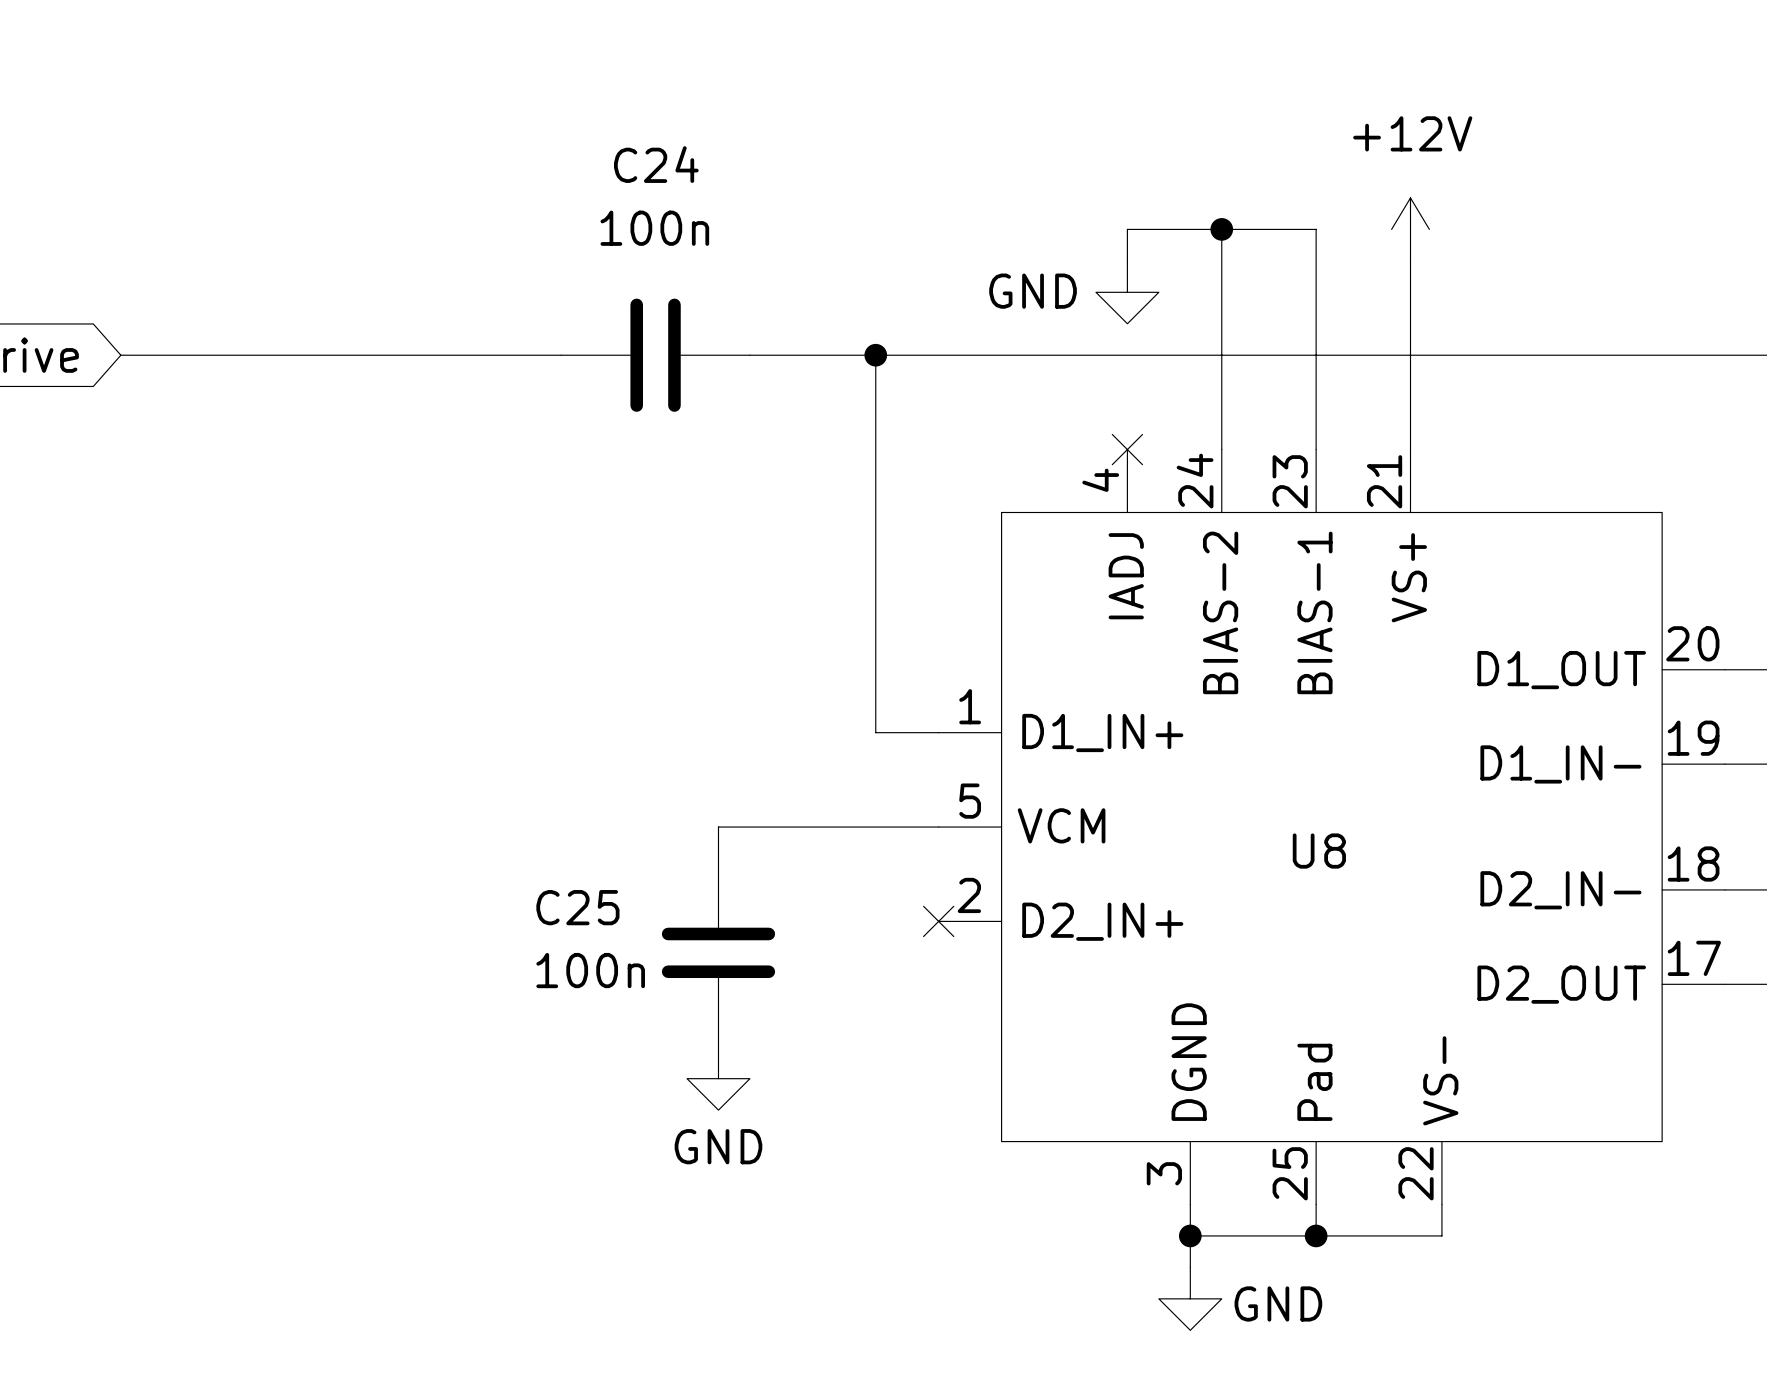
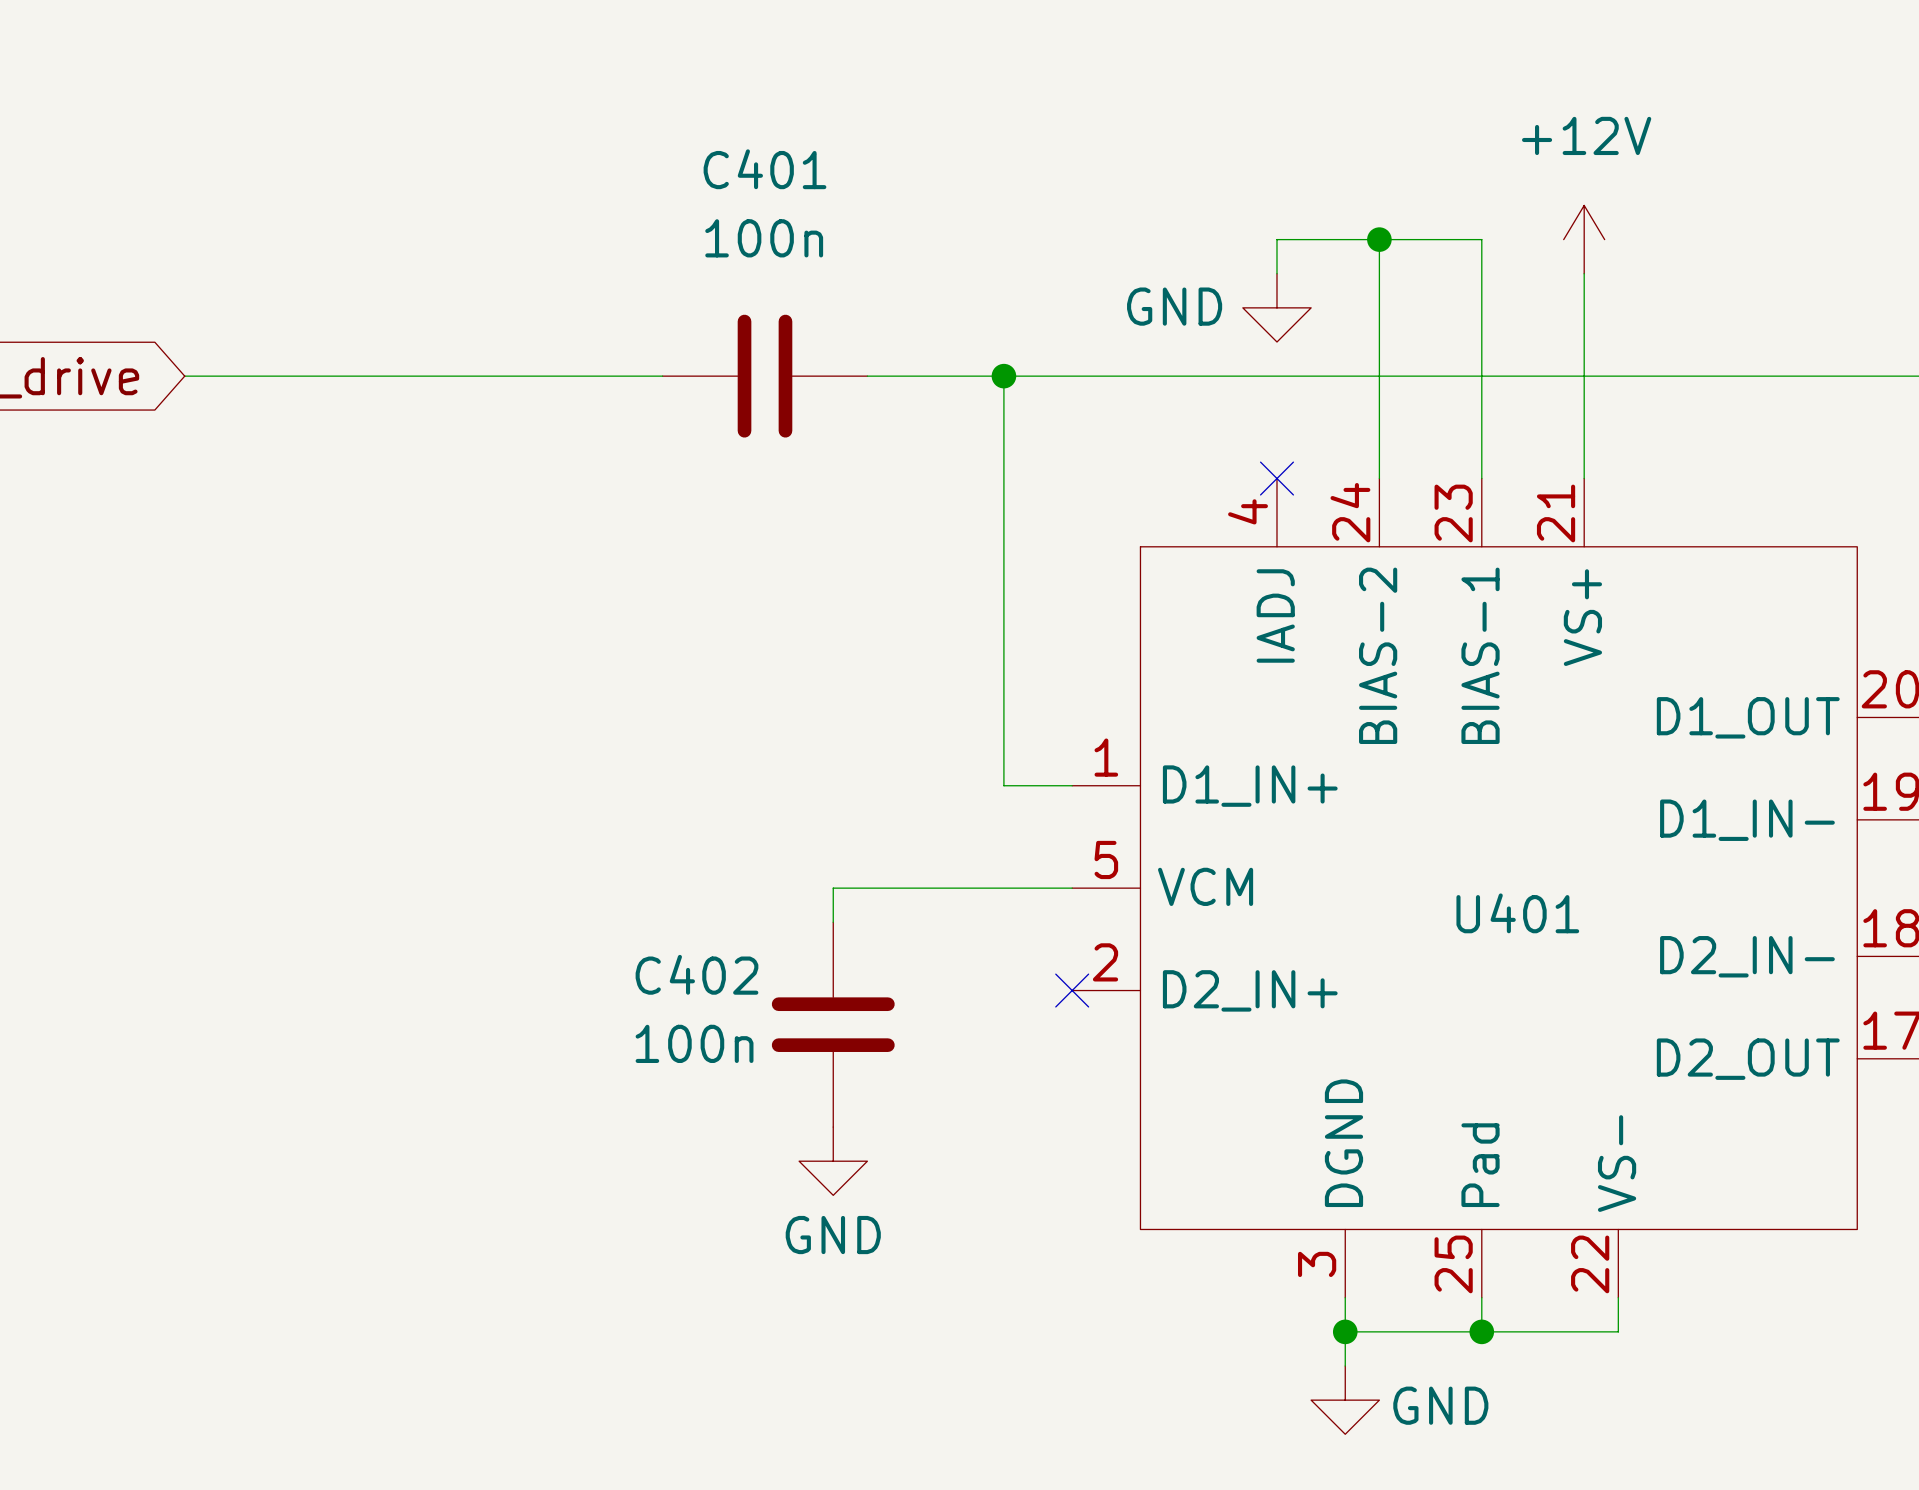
C24 name: C24 (656, 164) -> C401 (764, 169)
U8 name: U8 (1319, 851) -> U401 (1517, 913)
C25 name: C25 (577, 907) -> C402 (696, 974)

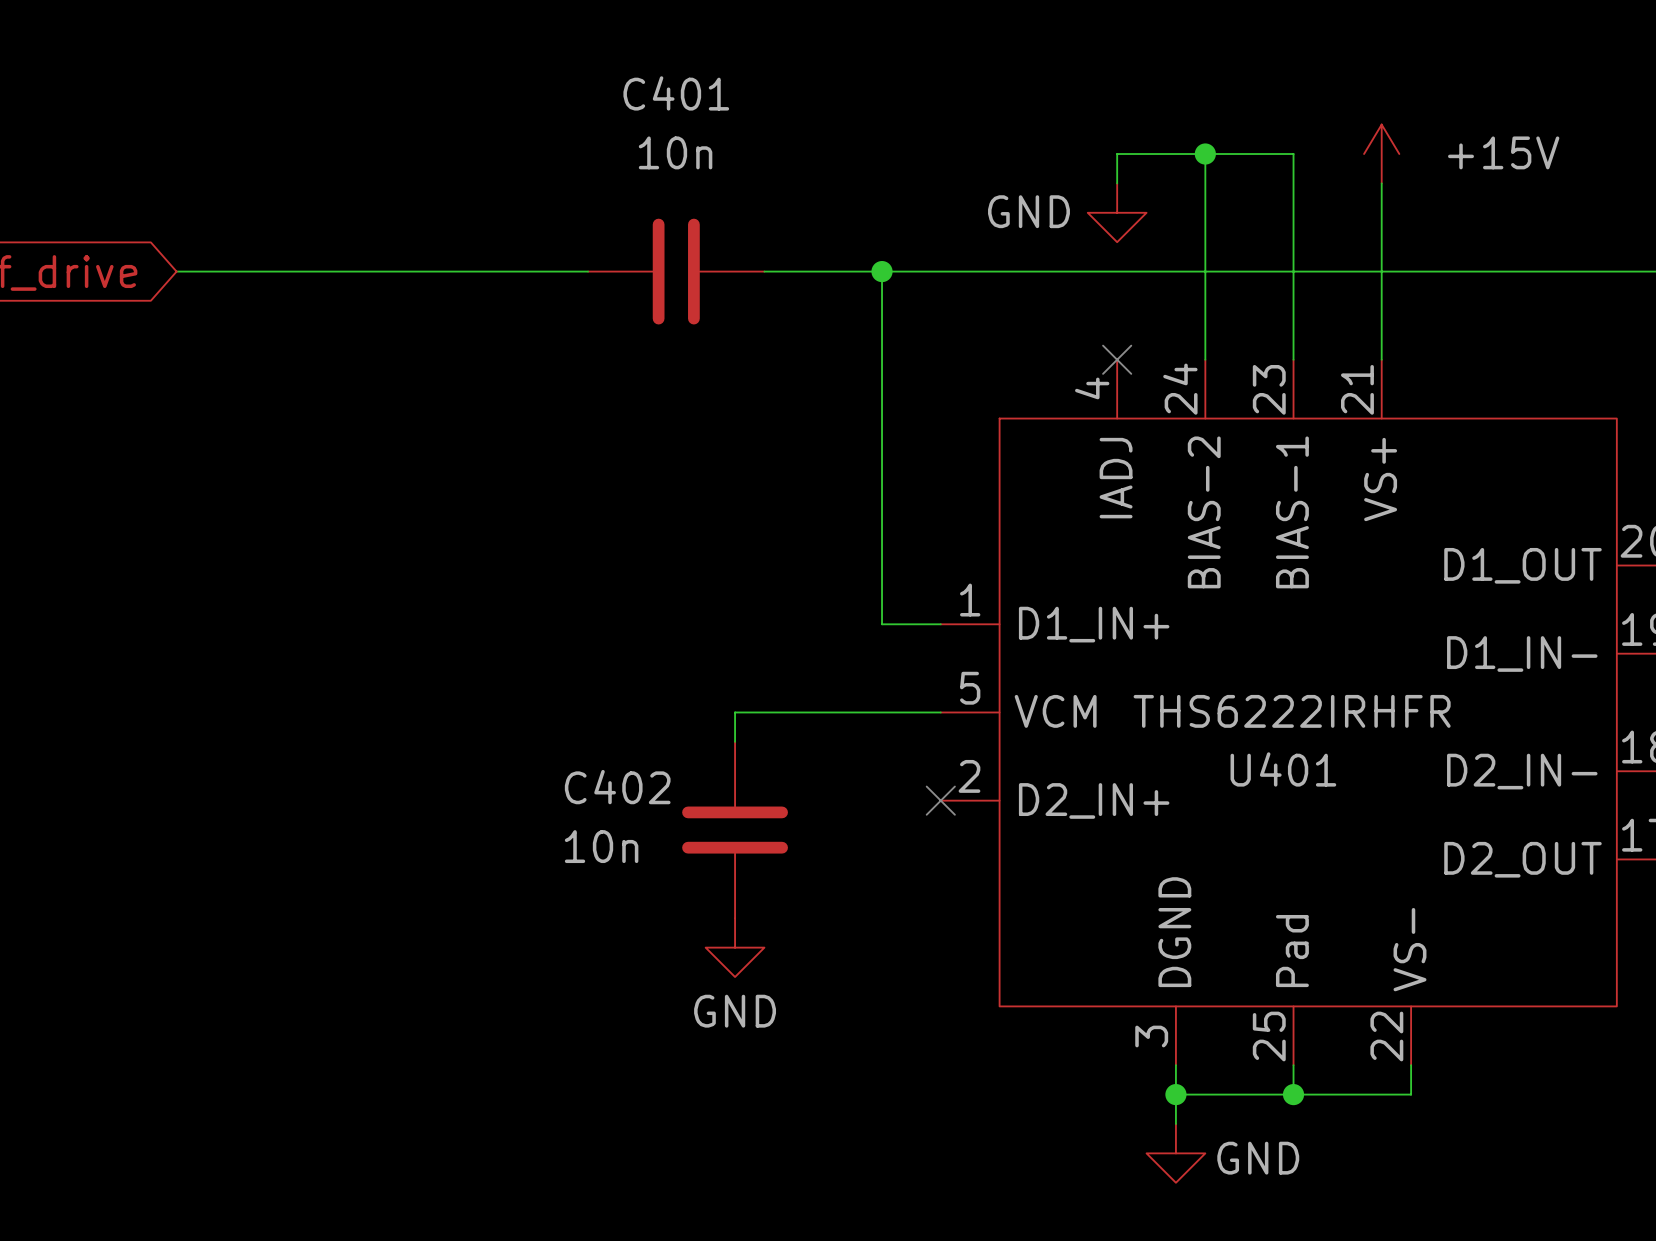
C401 value: 100n (764, 238) -> 10n (675, 152)
power symbol: +12V (1584, 239) -> +15V (1381, 154)
U401 value: none -> THS6222IRHFR (1292, 711)
U401 name position: U401 (1517, 913) -> U401 (1283, 769)
C402 value: 100n (694, 1043) -> 10n (601, 846)

